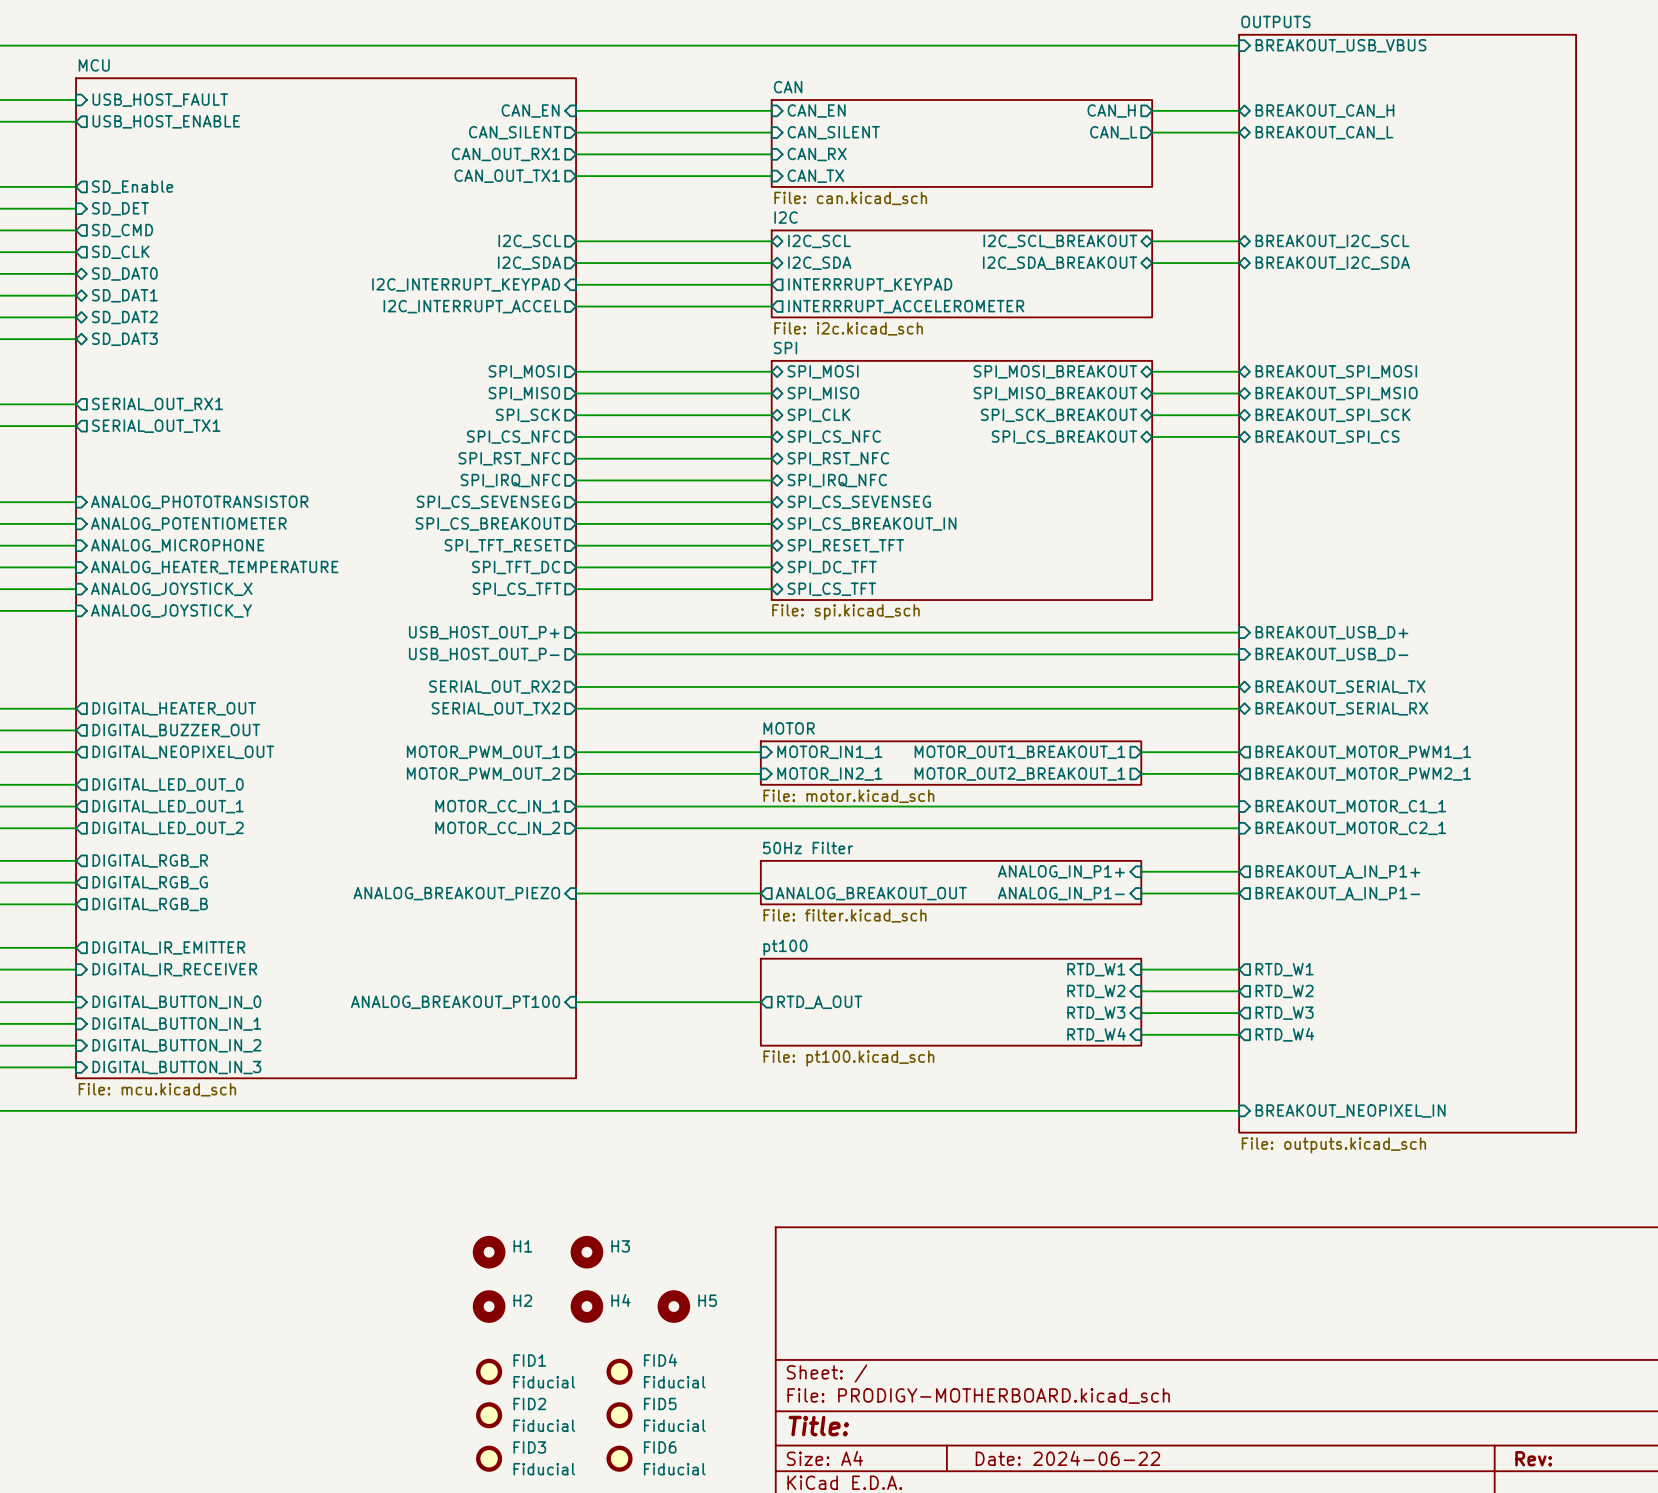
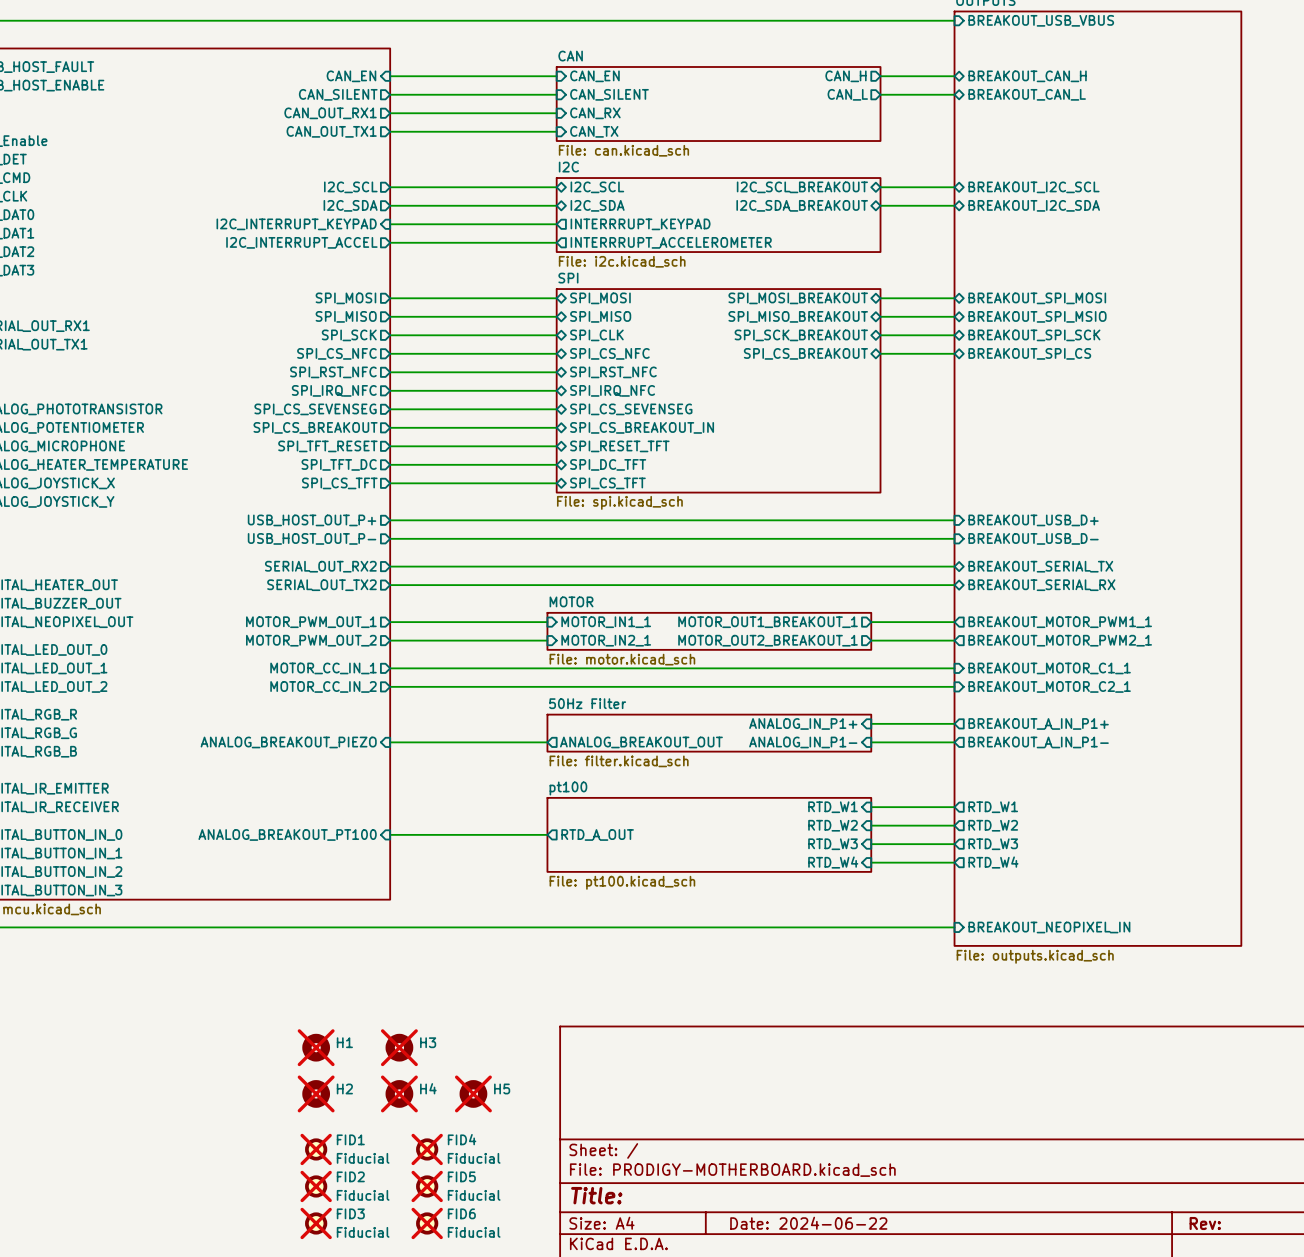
H1 do-not-place cross: none -> (316, 1047)
H3 do-not-place cross: none -> (399, 1047)
H2 do-not-place cross: none -> (316, 1093)
H4 do-not-place cross: none -> (399, 1093)
H5 do-not-place cross: none -> (473, 1093)
FID1 do-not-place cross: none -> (316, 1149)
FID4 do-not-place cross: none -> (427, 1149)
FID2 do-not-place cross: none -> (316, 1186)
FID5 do-not-place cross: none -> (427, 1186)
FID3 do-not-place cross: none -> (316, 1223)
FID6 do-not-place cross: none -> (427, 1223)

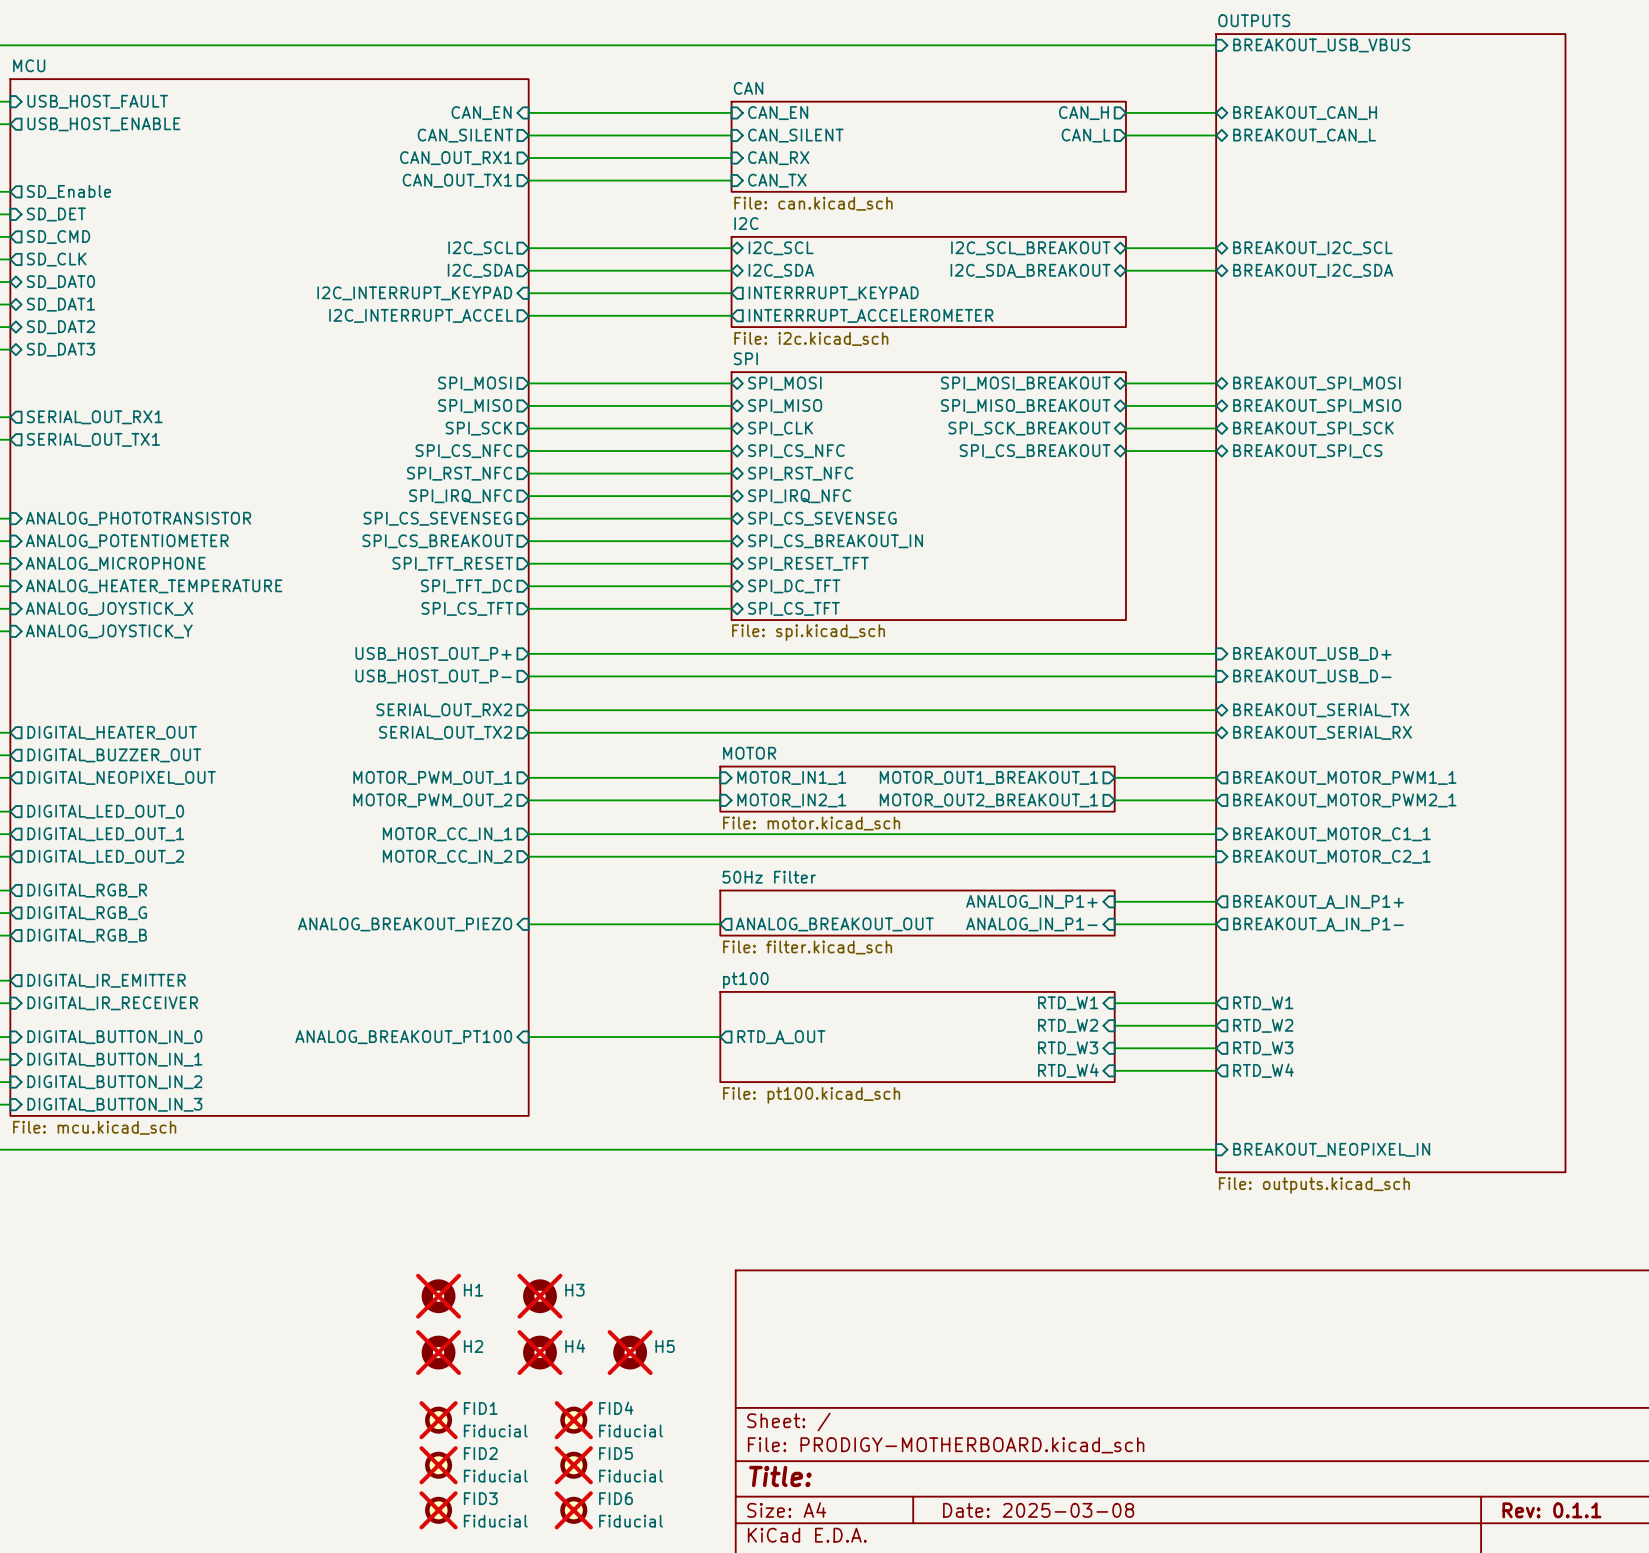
title block: Date: 2024-06-22 (808, 1223) -> Date: 2025-03-08 (1038, 1510)
title block: Rev: (1205, 1223) -> Rev: 0.1.1 (1551, 1510)

